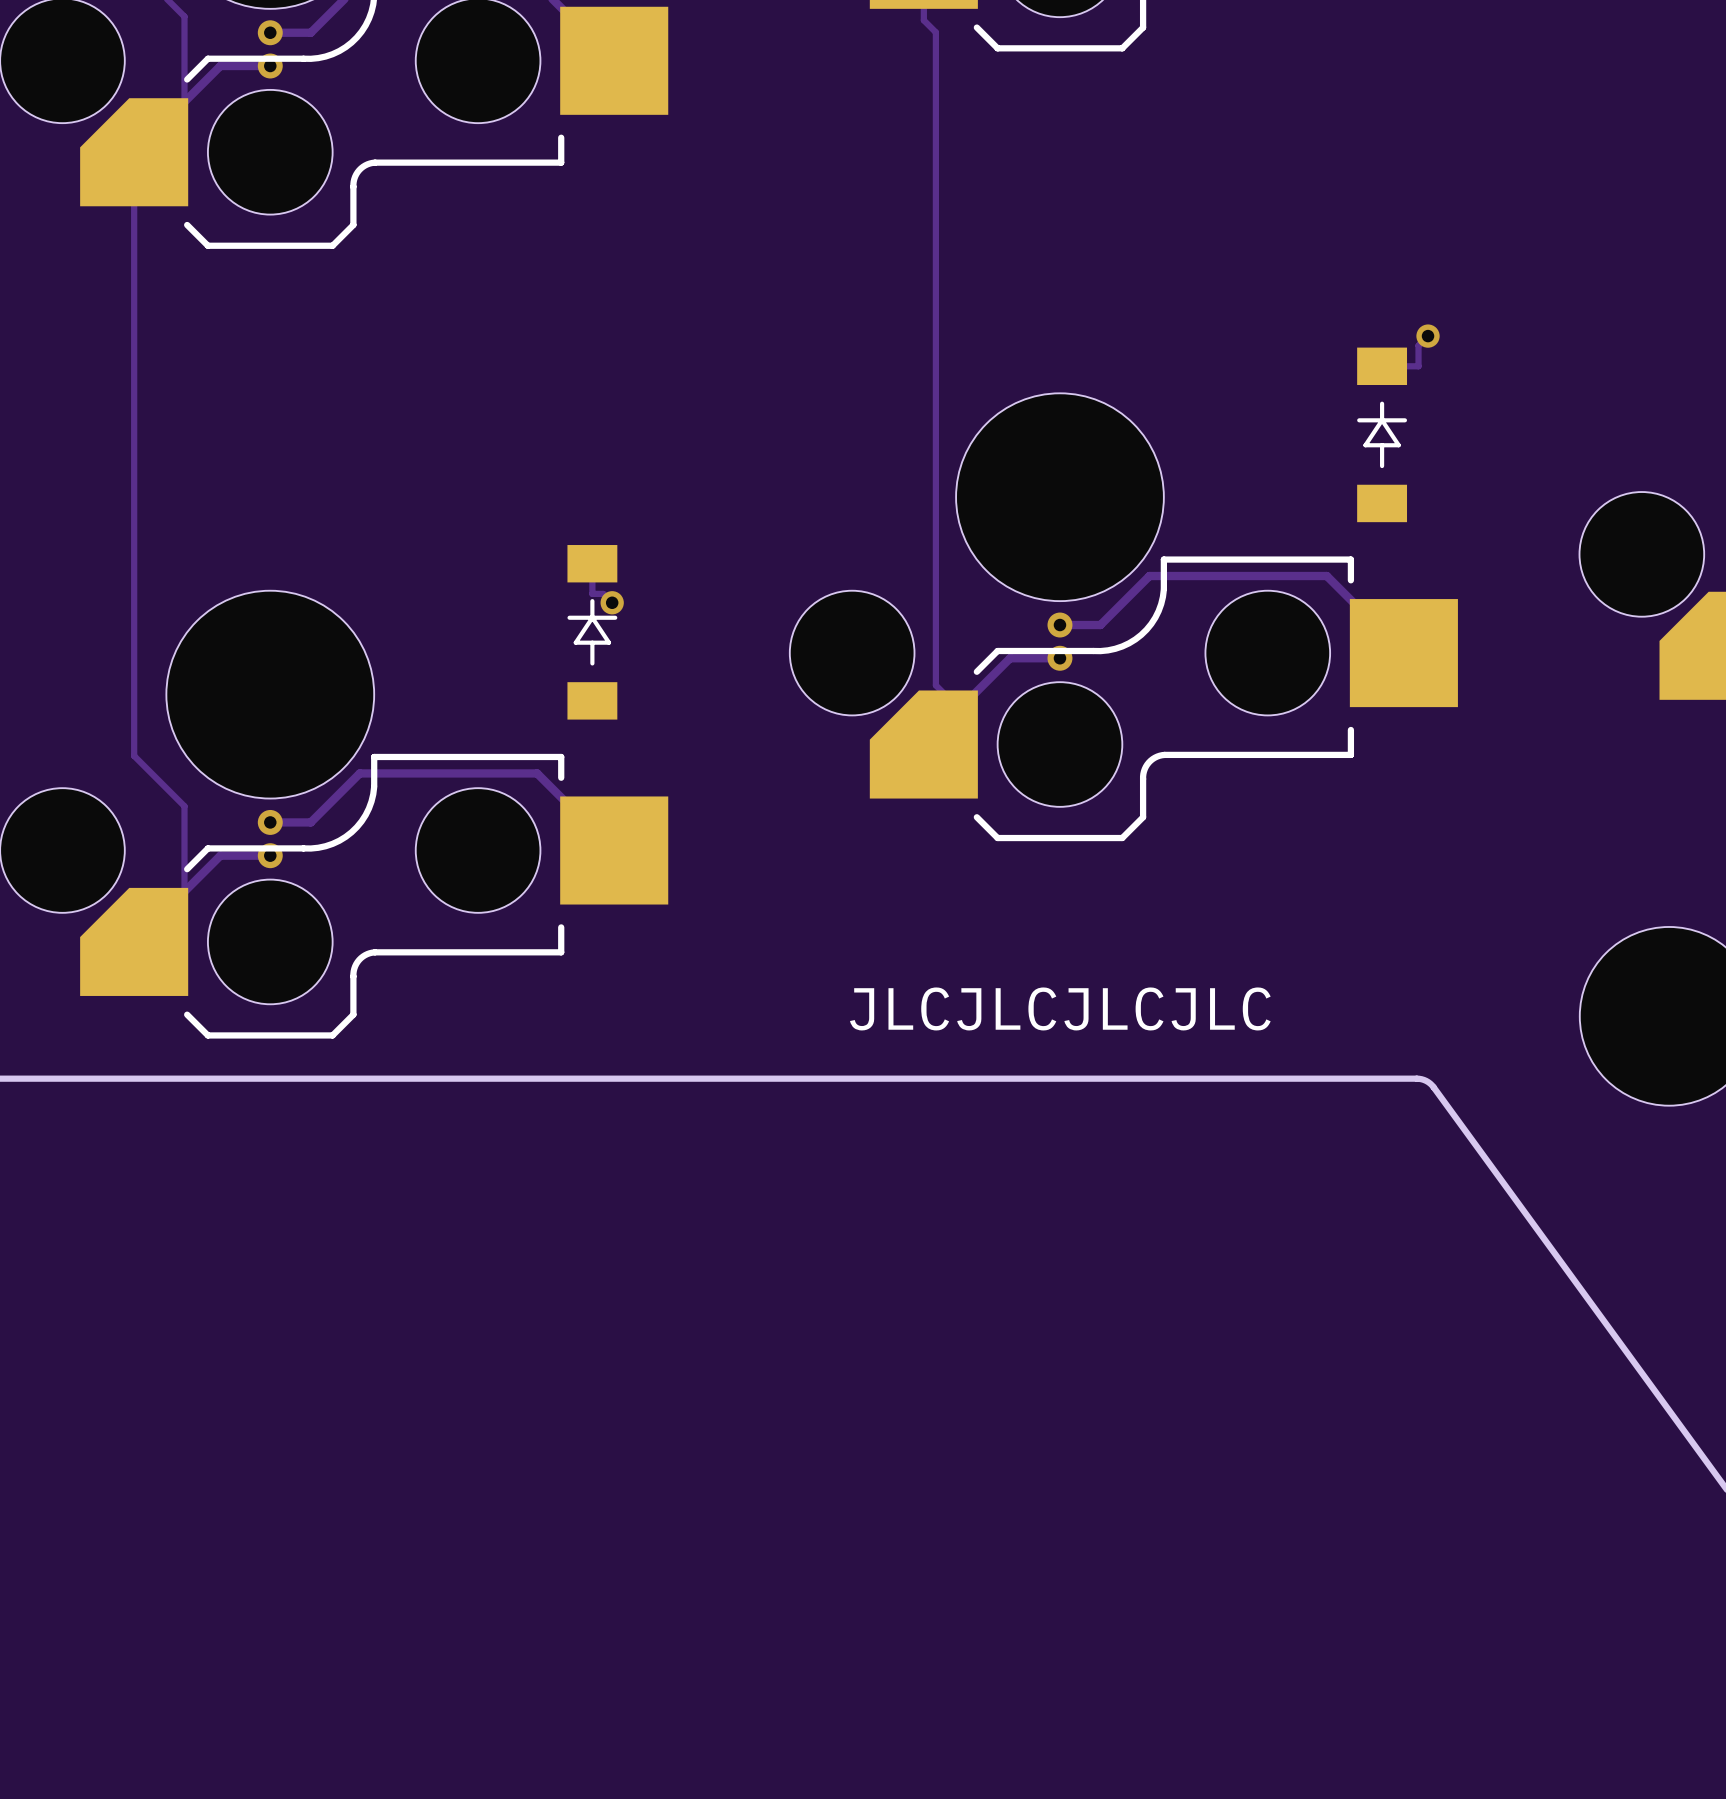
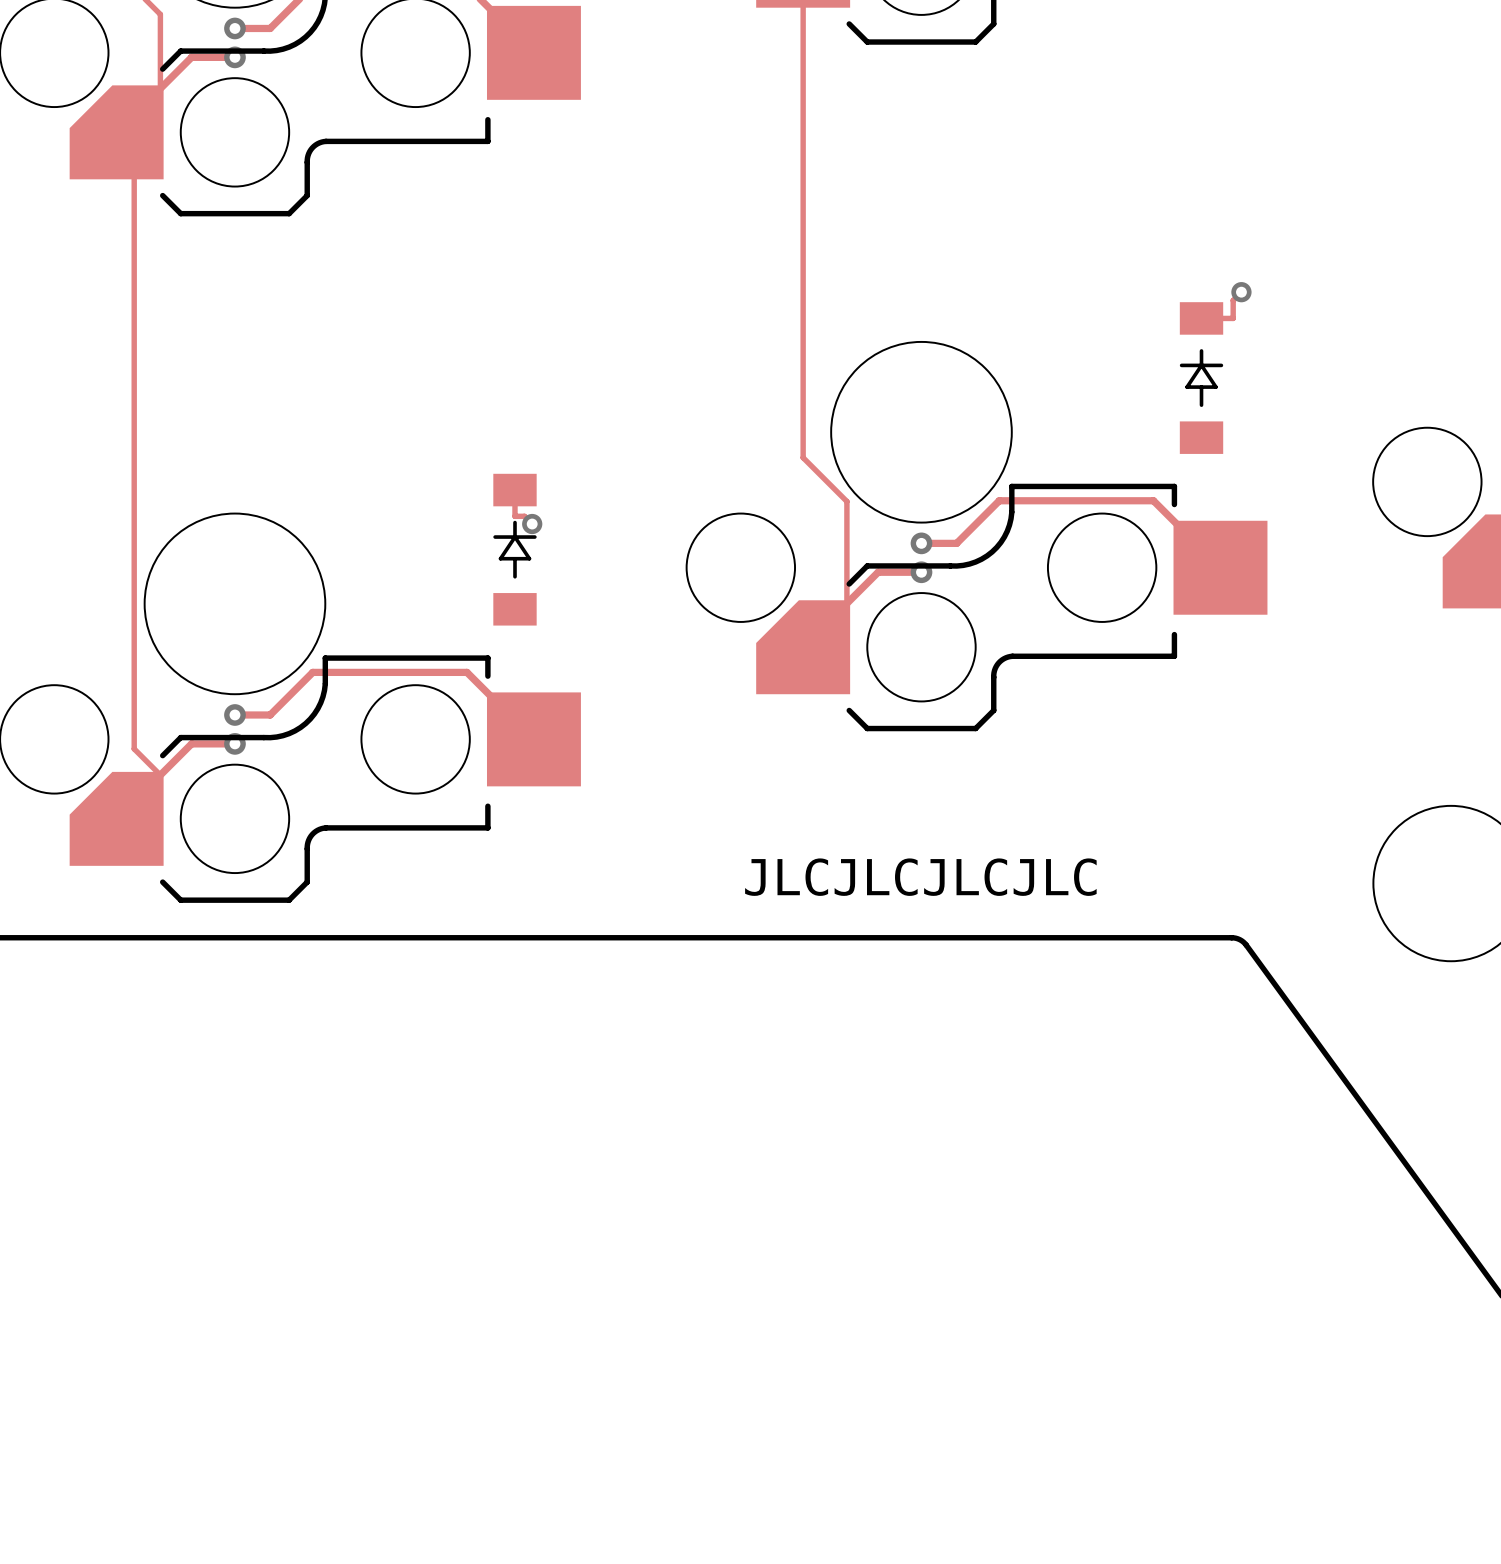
track: (923, 20) (935, 32) (935, 685) (959, 708) -> (803, 17) (803, 457) (846, 501) (846, 603)
track: (134, 152) (134, 755) (184, 806) (184, 891) -> (160, 88) (134, 114) (134, 748) (160, 775)

